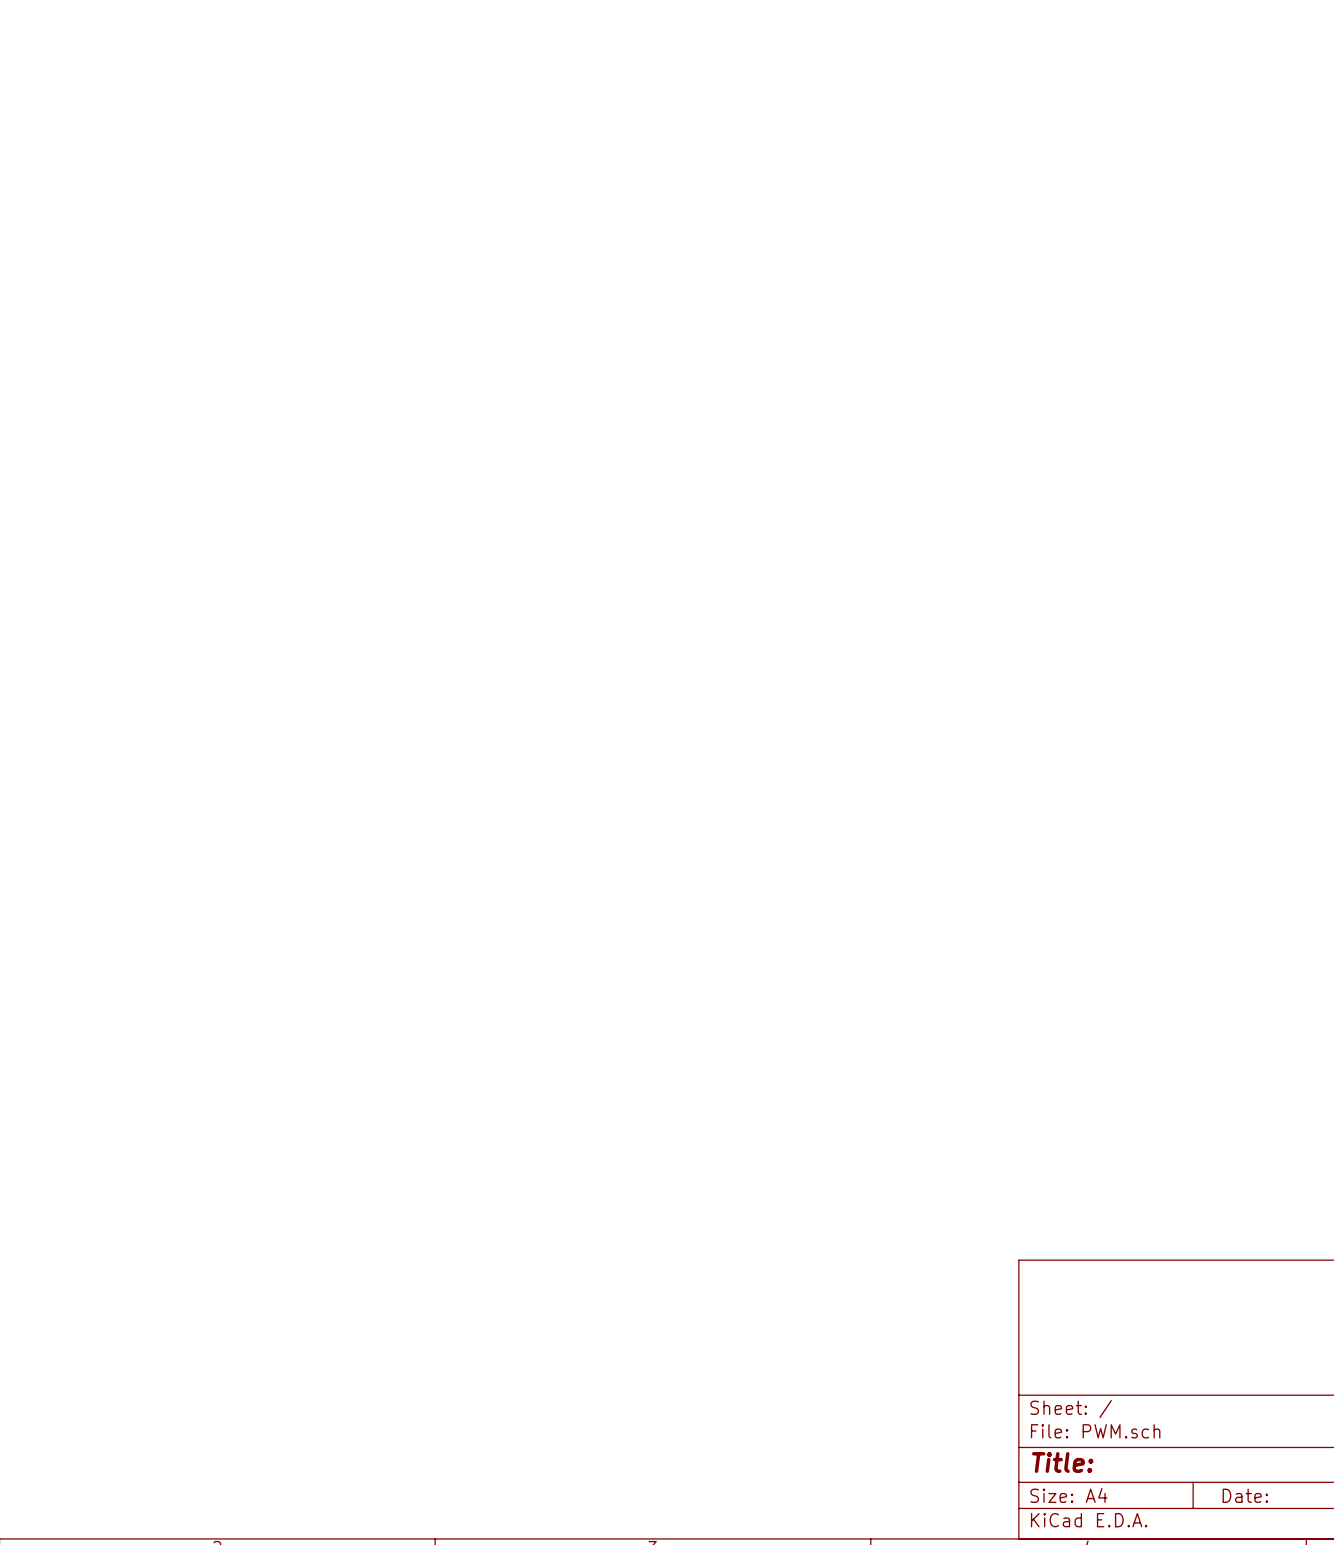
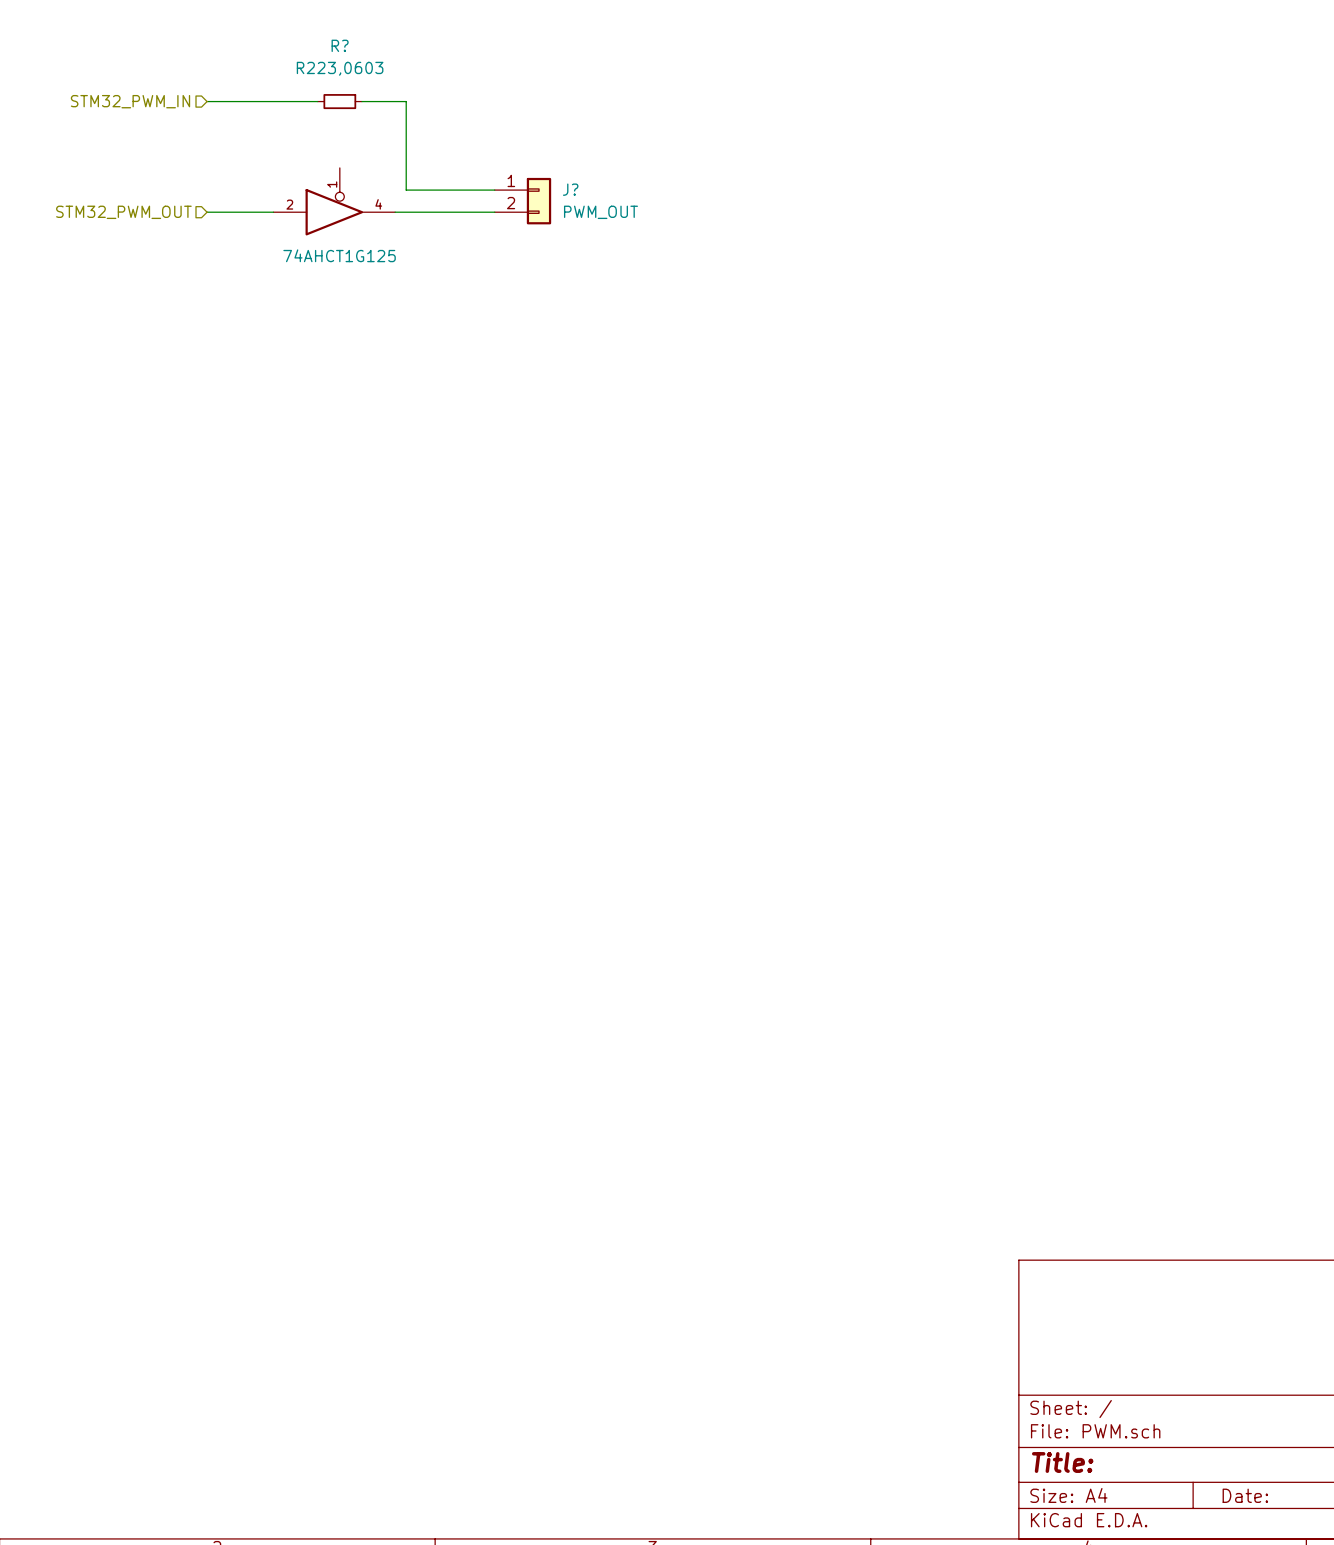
hierarchical label: none -> STM32_PWM_IN (130, 101)
wire: none -> (207, 101) (317, 101)
R?: none -> R223,0603 (339, 101)
wire: none -> (361, 101) (406, 101) (406, 190) (494, 190)
part: none -> 74AHCT1G125 (334, 201)
J?: none -> PWM_OUT (522, 201)
hierarchical label: none -> STM32_PWM_OUT (123, 212)
wire: none -> (207, 212) (273, 212)
wire: none -> (395, 212) (494, 212)

